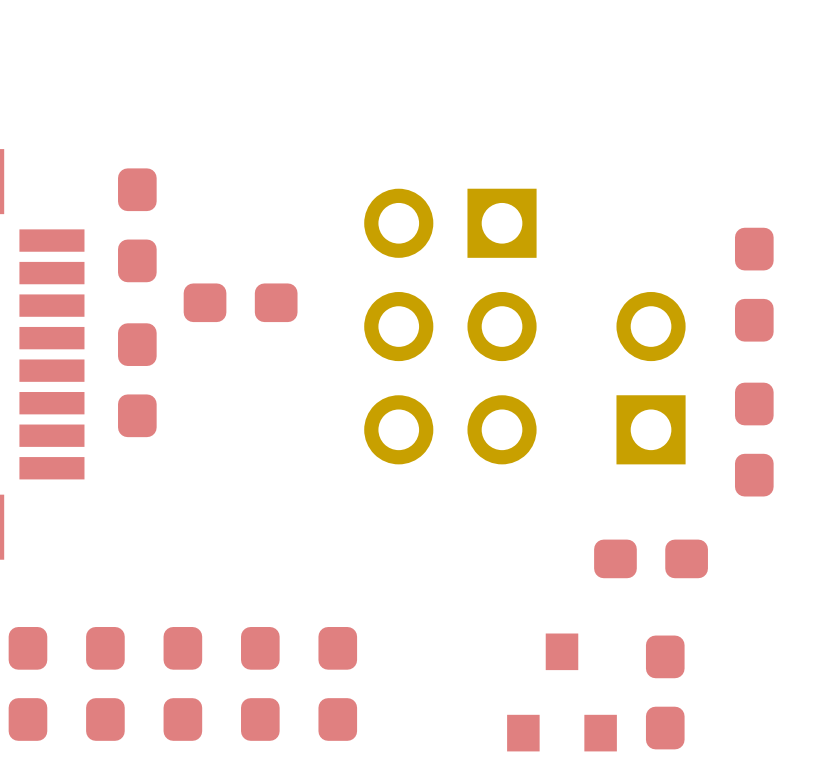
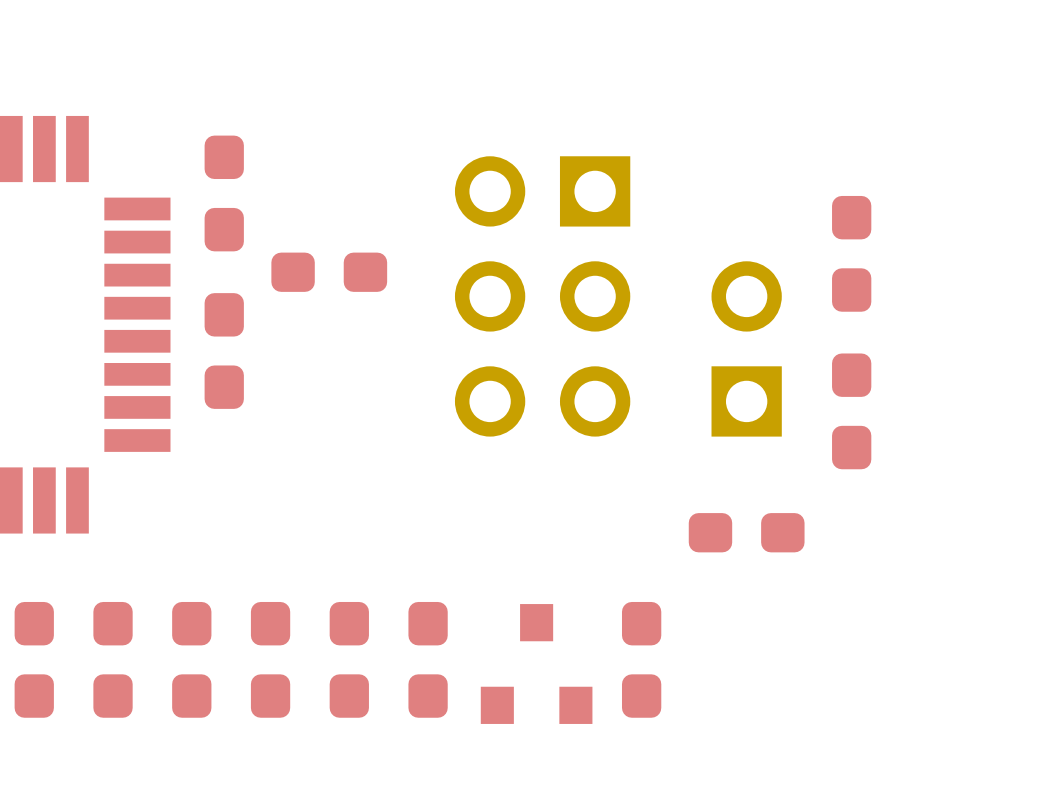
part footprint: [507, 633, 617, 752] -> [621, 601, 662, 718]
part: none -> (536, 664)
part: (665, 692) -> none

